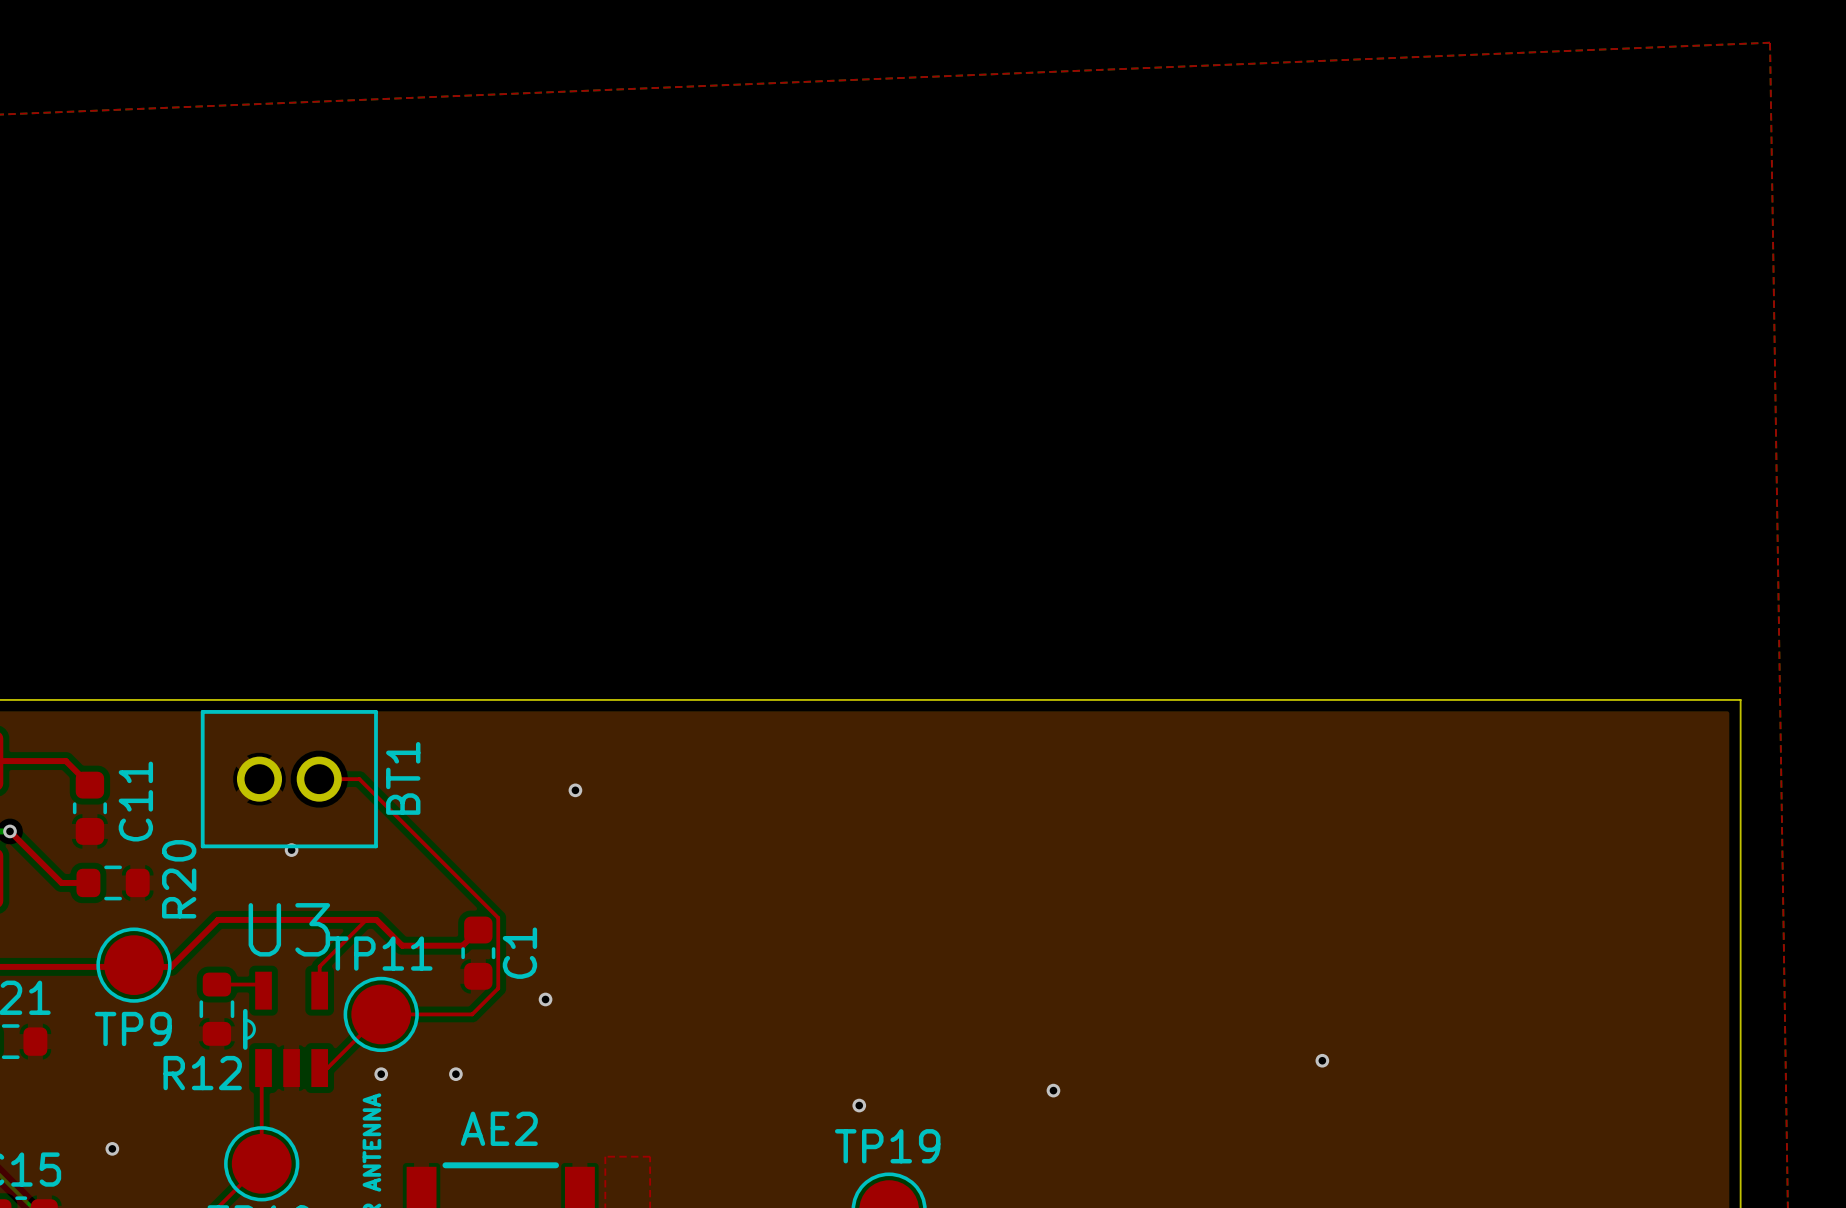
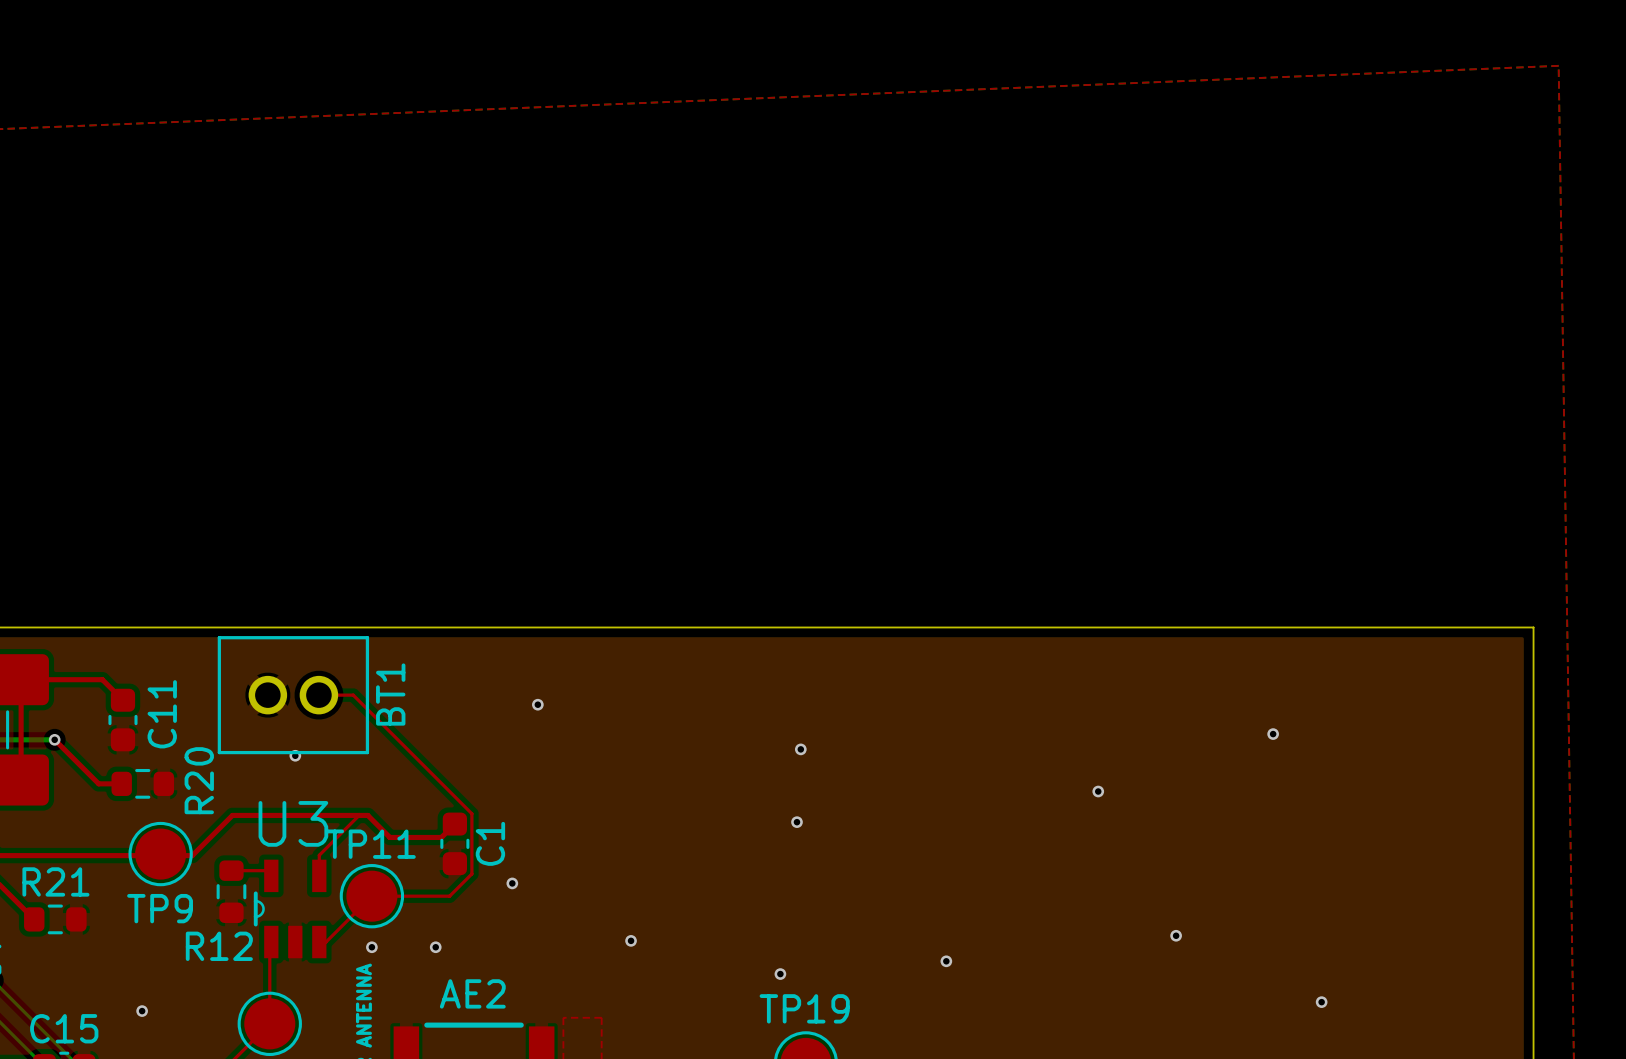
via: none -> (1273, 734)
via: none -> (800, 749)
via: none -> (1098, 791)
via: none -> (796, 822)
via: none -> (631, 940)
via: none -> (1321, 1002)

